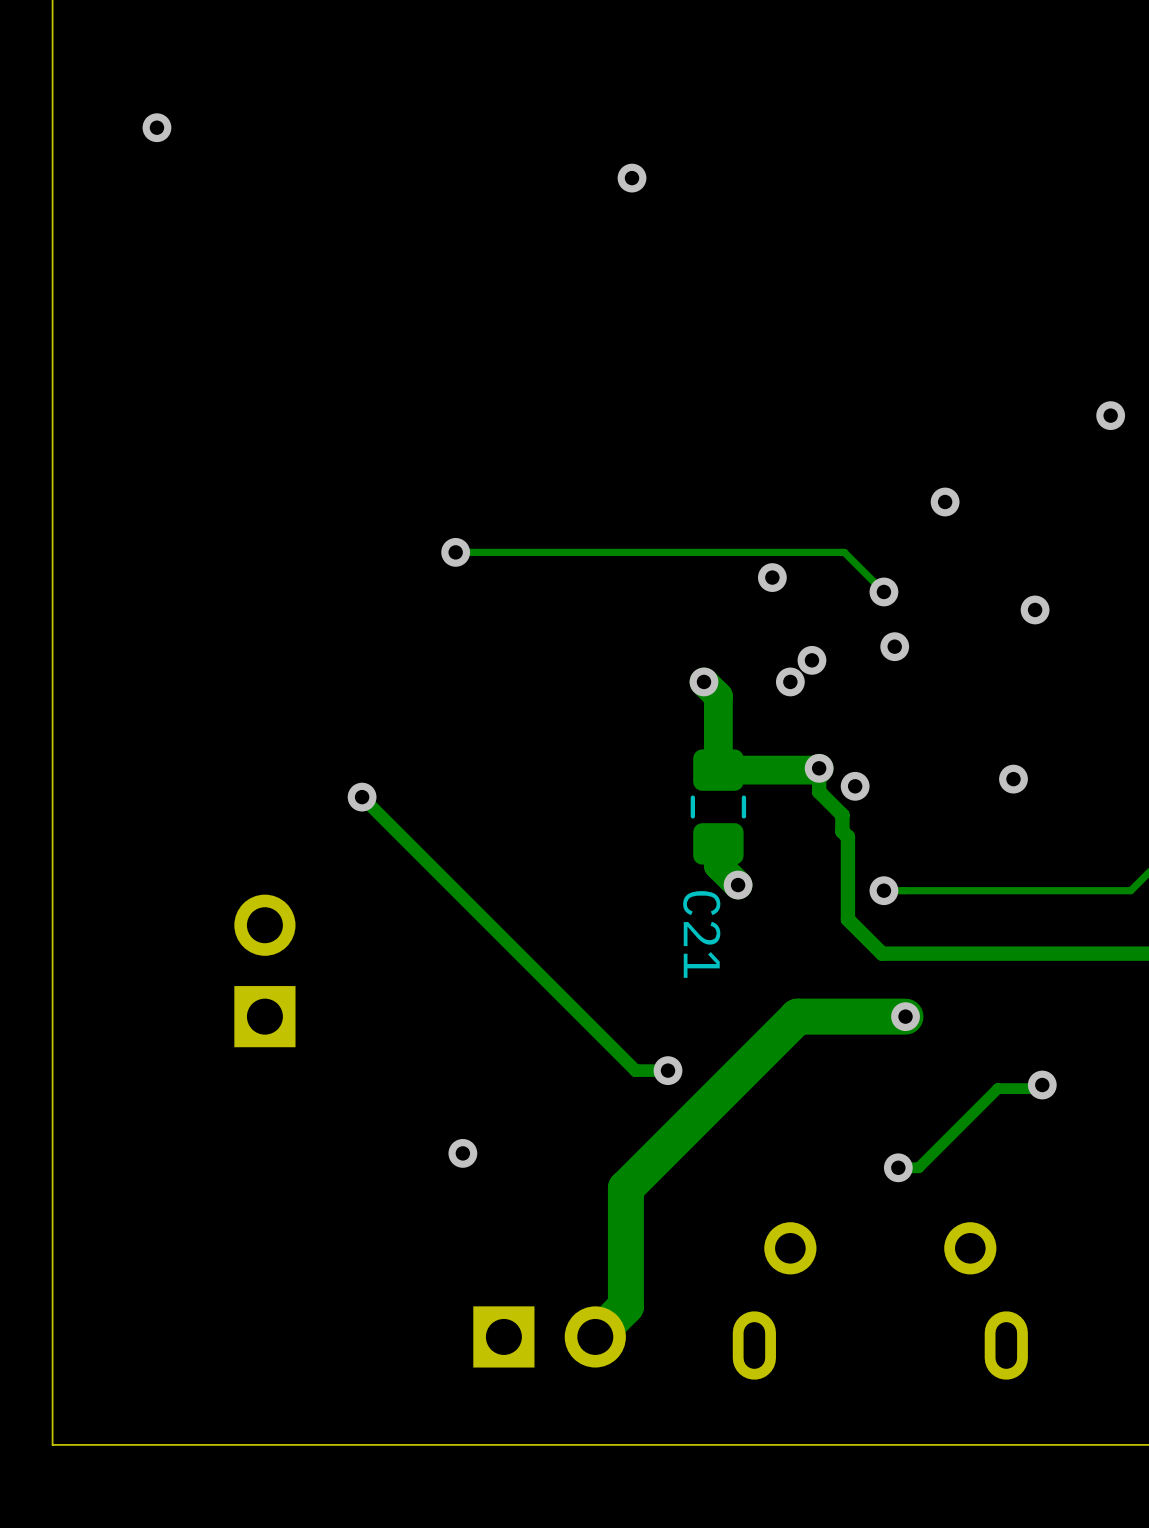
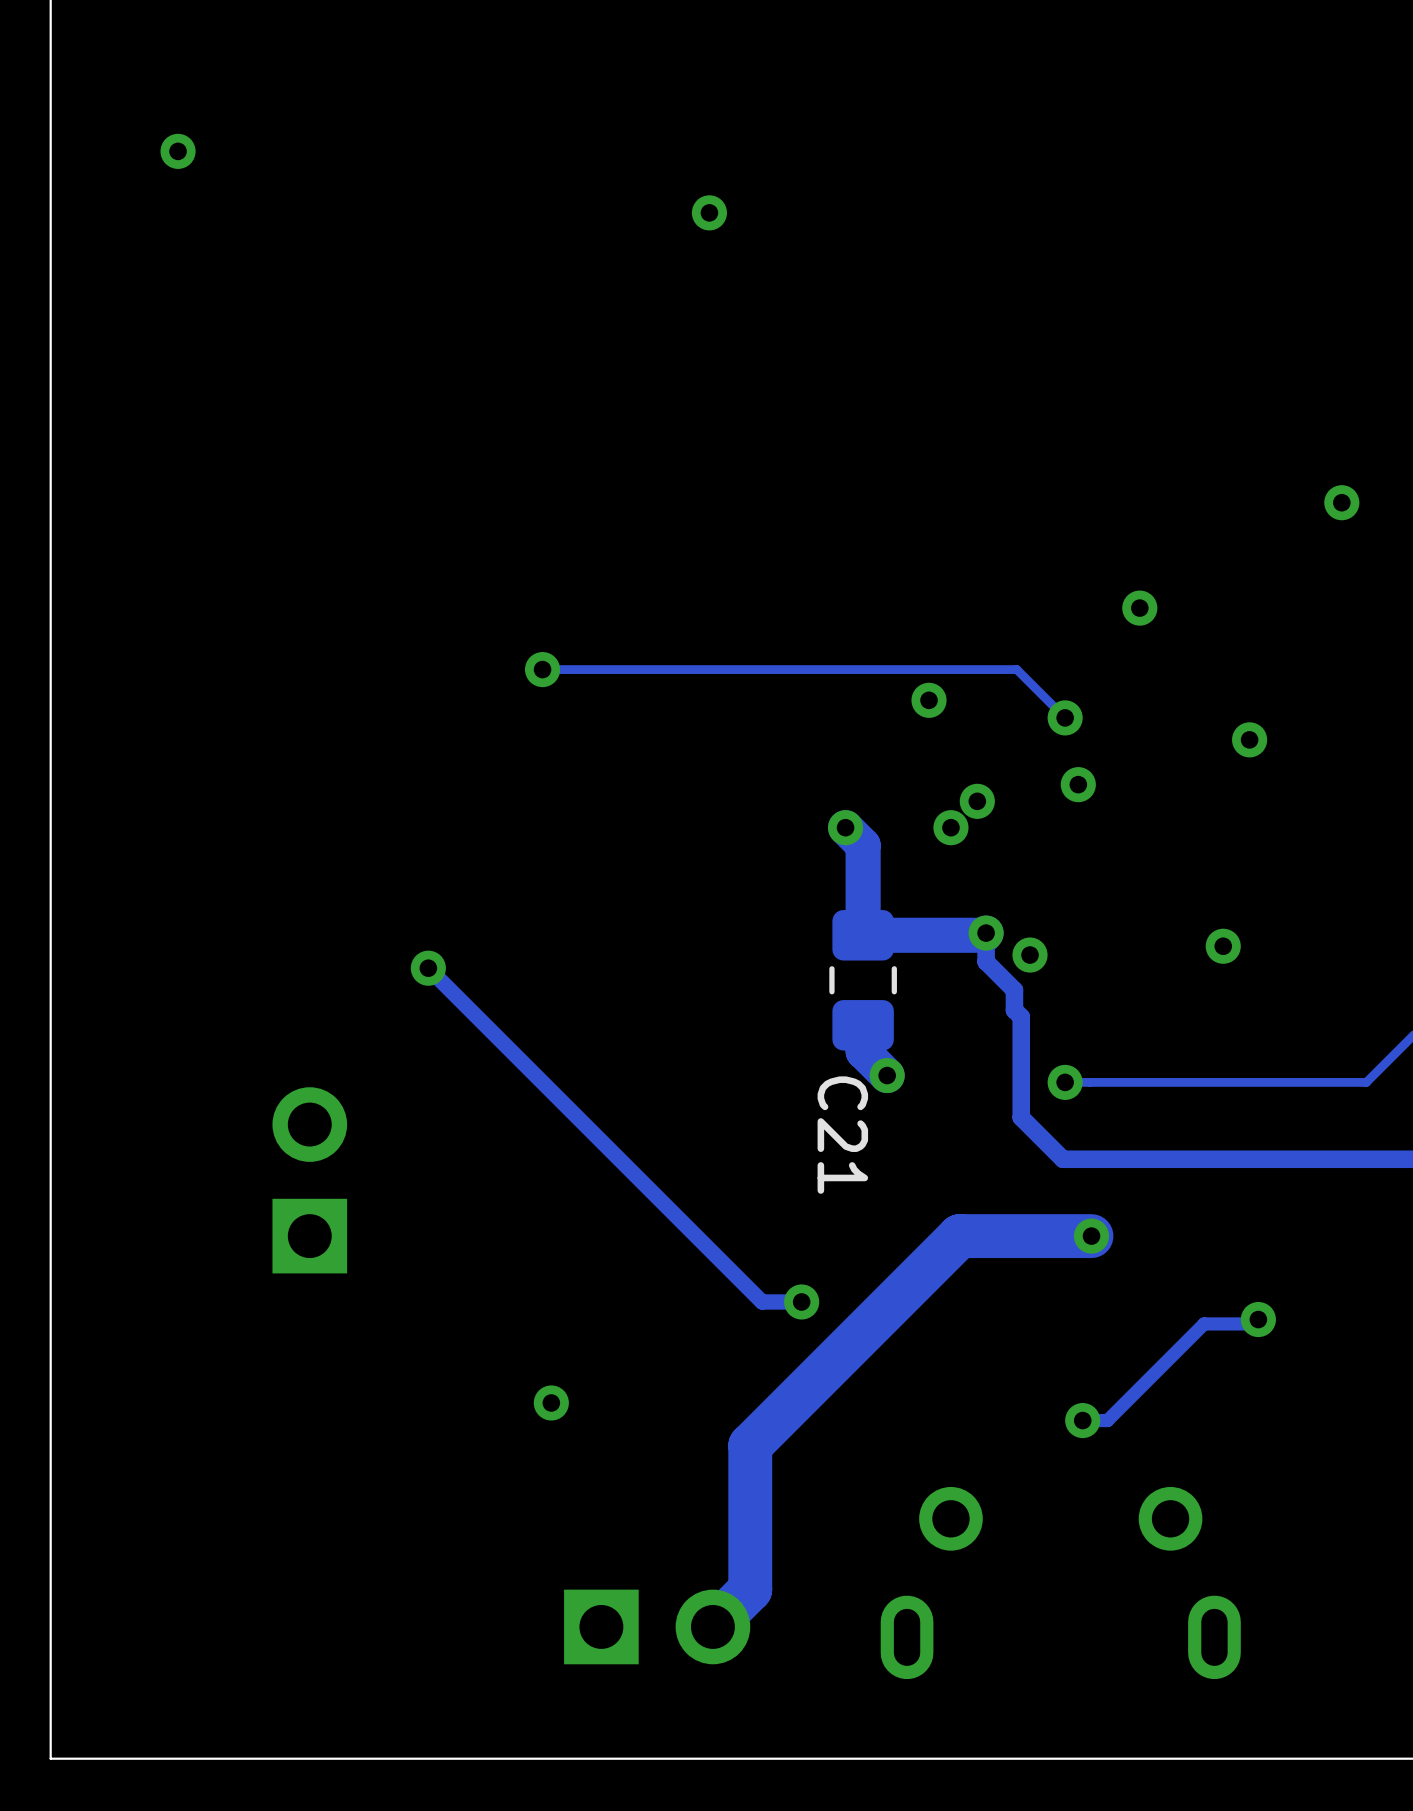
via position: (632, 178) -> (709, 212)

